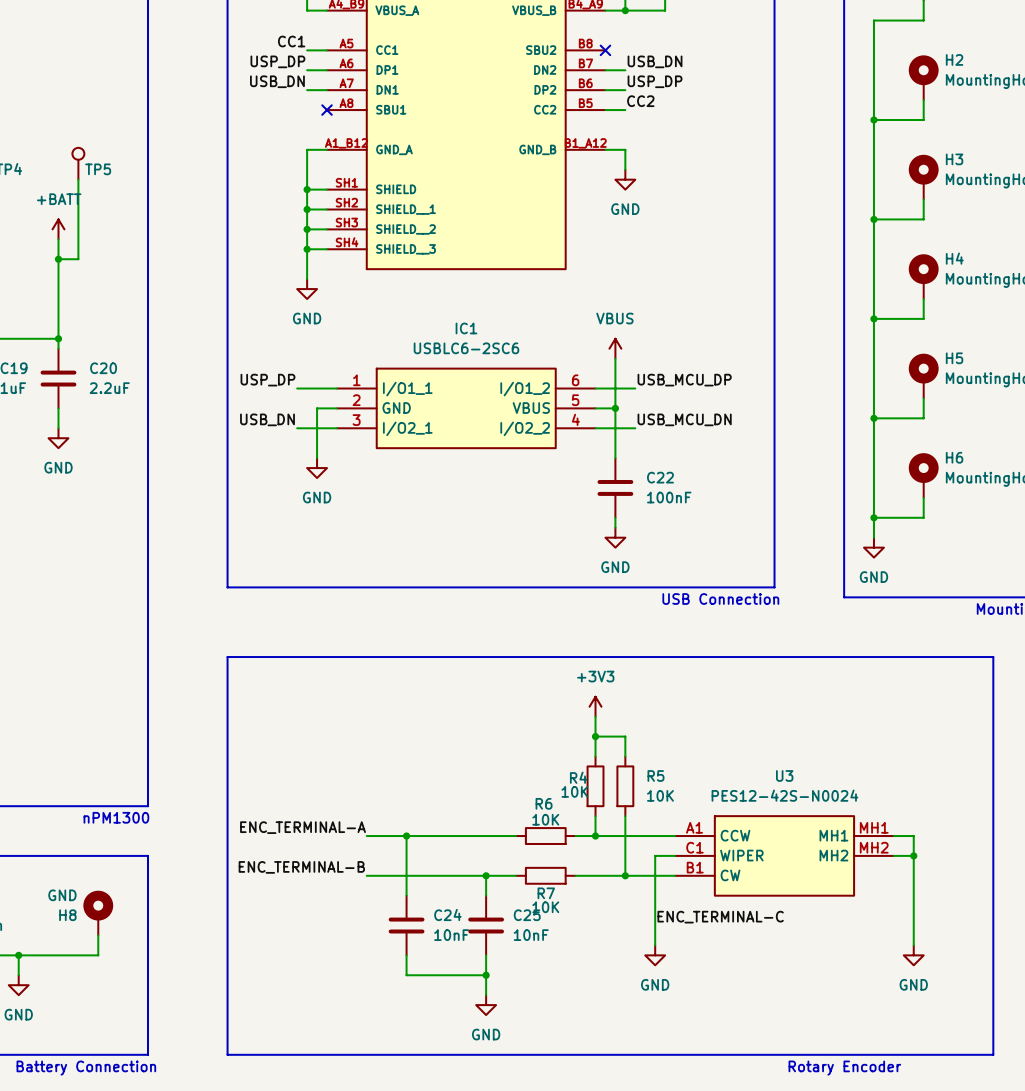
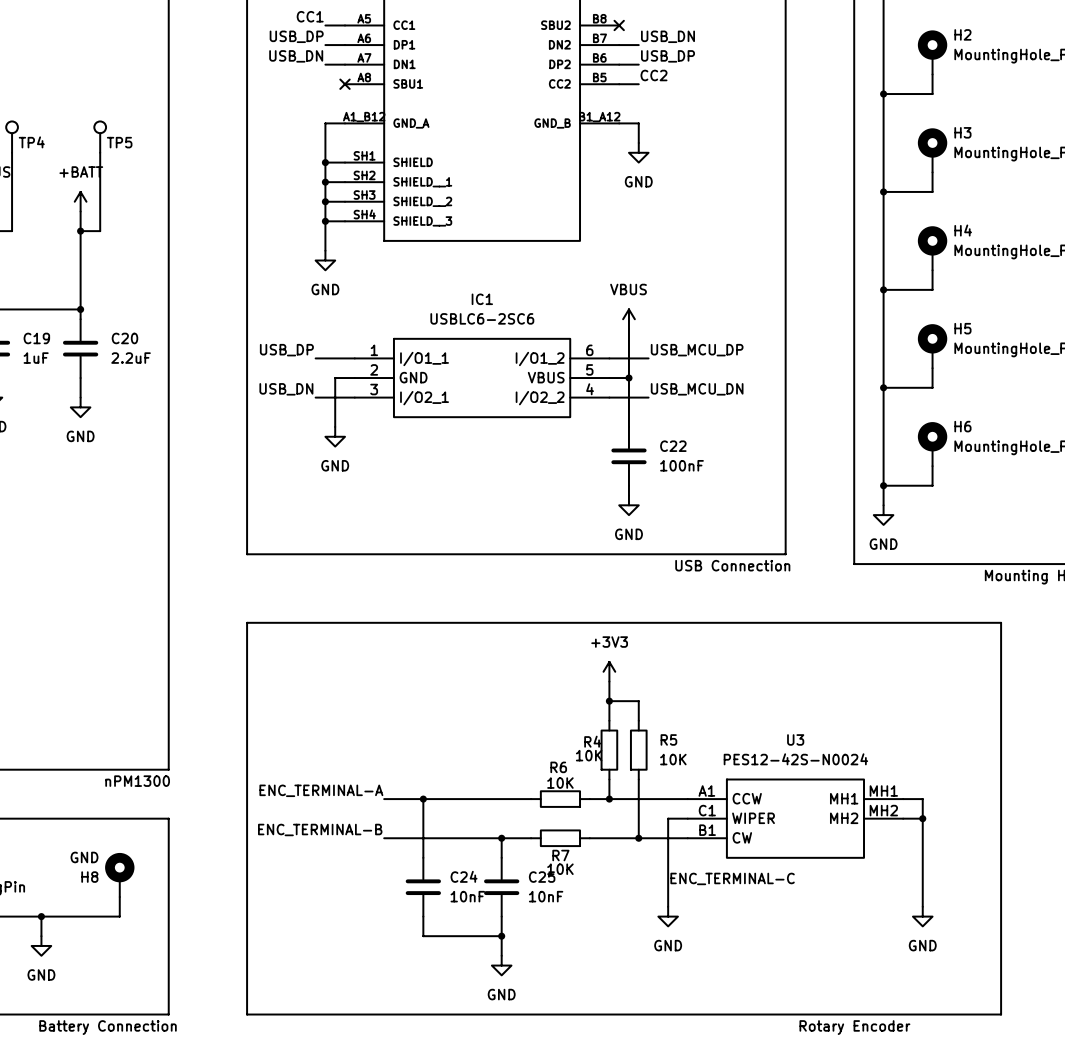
label: USP_DP (277, 61) -> USB_DP (296, 36)
label: USP_DP (655, 81) -> USB_DP (667, 56)
label: USP_DP (267, 380) -> USB_DP (286, 350)

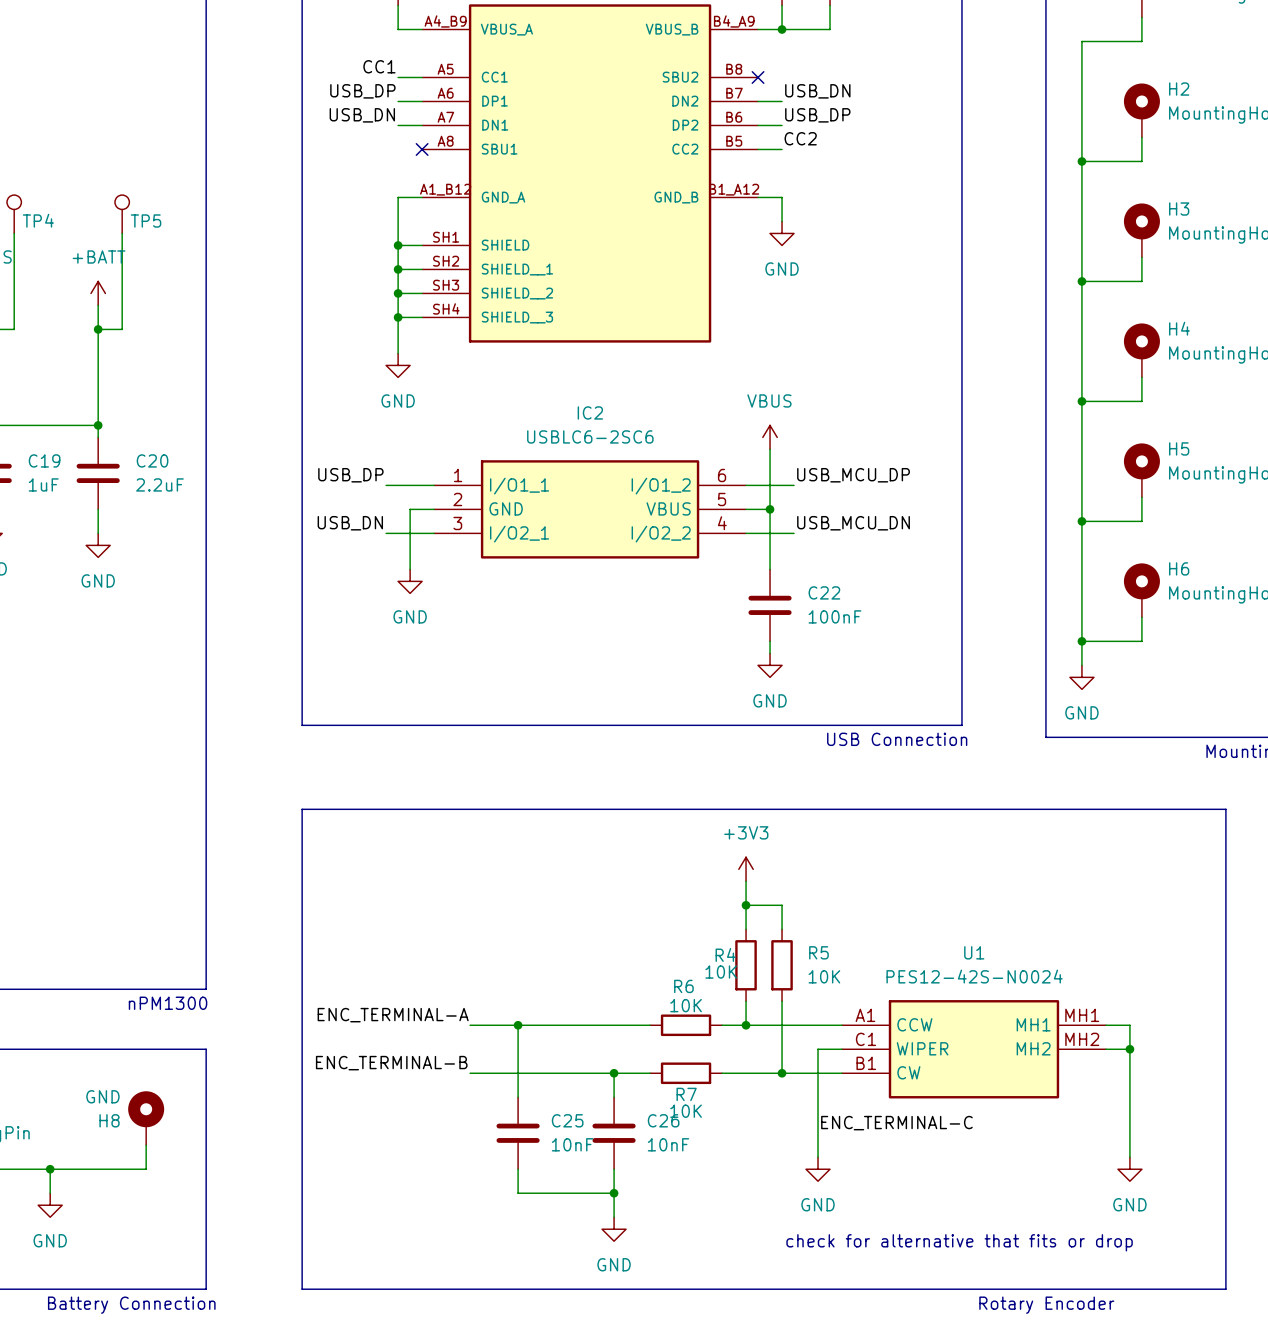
IC1 name: IC1 (482, 299) -> IC2 (590, 412)
U3 name: U3 (795, 739) -> U1 (974, 952)
C24 name: C24 (464, 876) -> C25 (567, 1120)
C25 name: C25 (542, 877) -> C26 (663, 1120)
text: none -> check for alternative that fits or drop (959, 1242)

